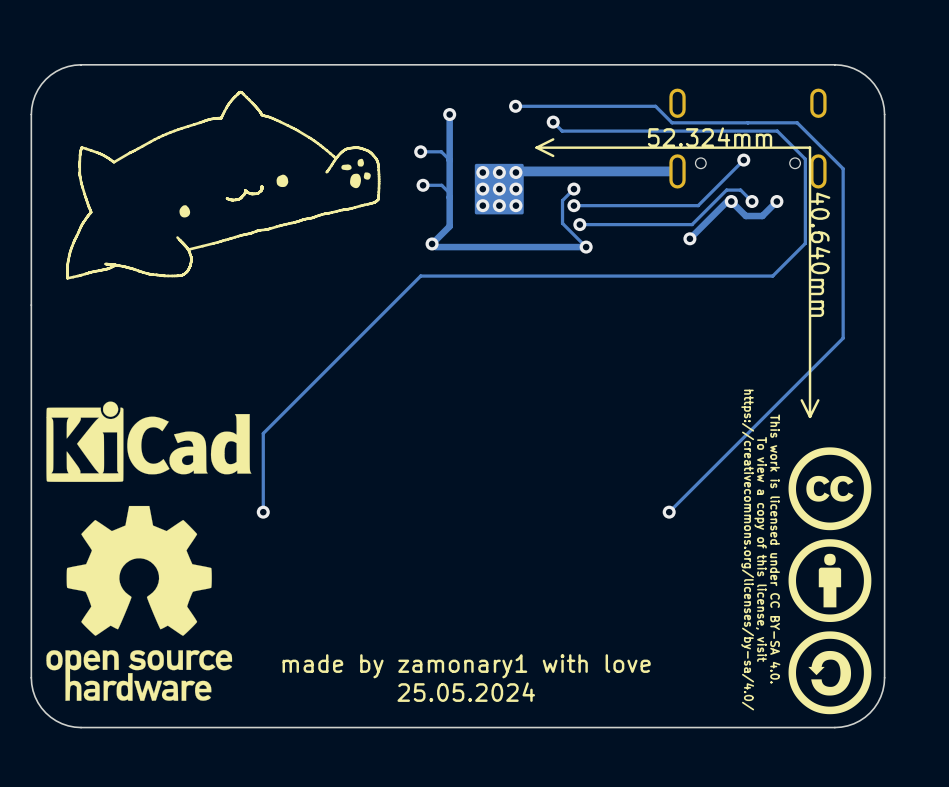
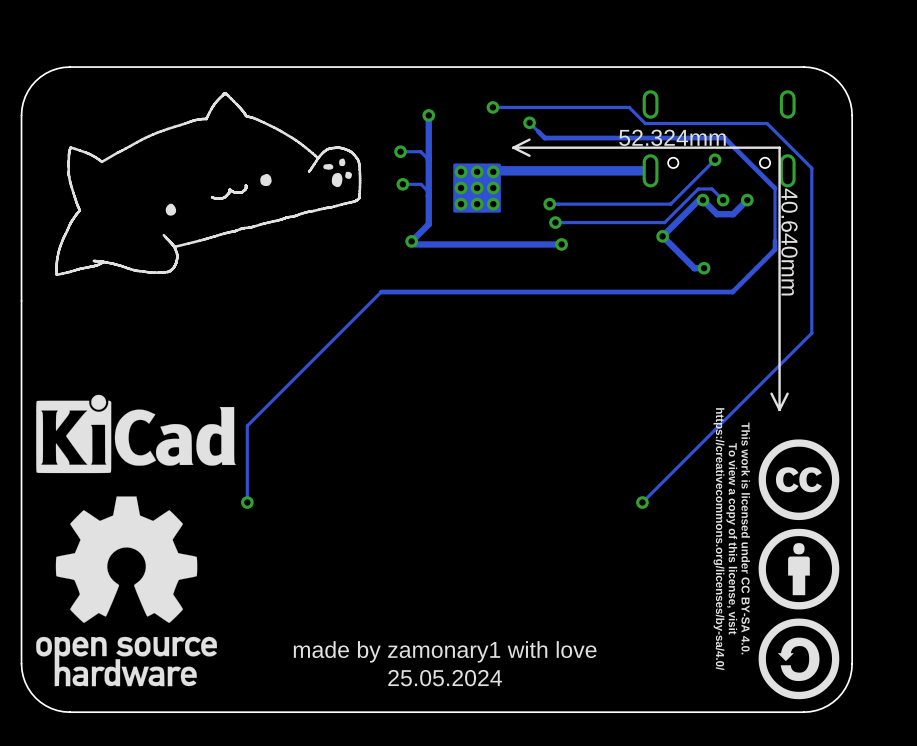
track: (562, 131) (777, 131) (805, 159) (805, 189) -> (538, 131) (544, 138) (724, 138) (775, 188)
track: (573, 189) (562, 200) (562, 223) (586, 247) -> none
via: (573, 189) -> none
track: none -> (662, 236) (694, 268) (704, 268)
track: (805, 243) (772, 276) (420, 276) (400, 295) -> (775, 240) (775, 249) (732, 292) (381, 292)
via: none -> (704, 268)

